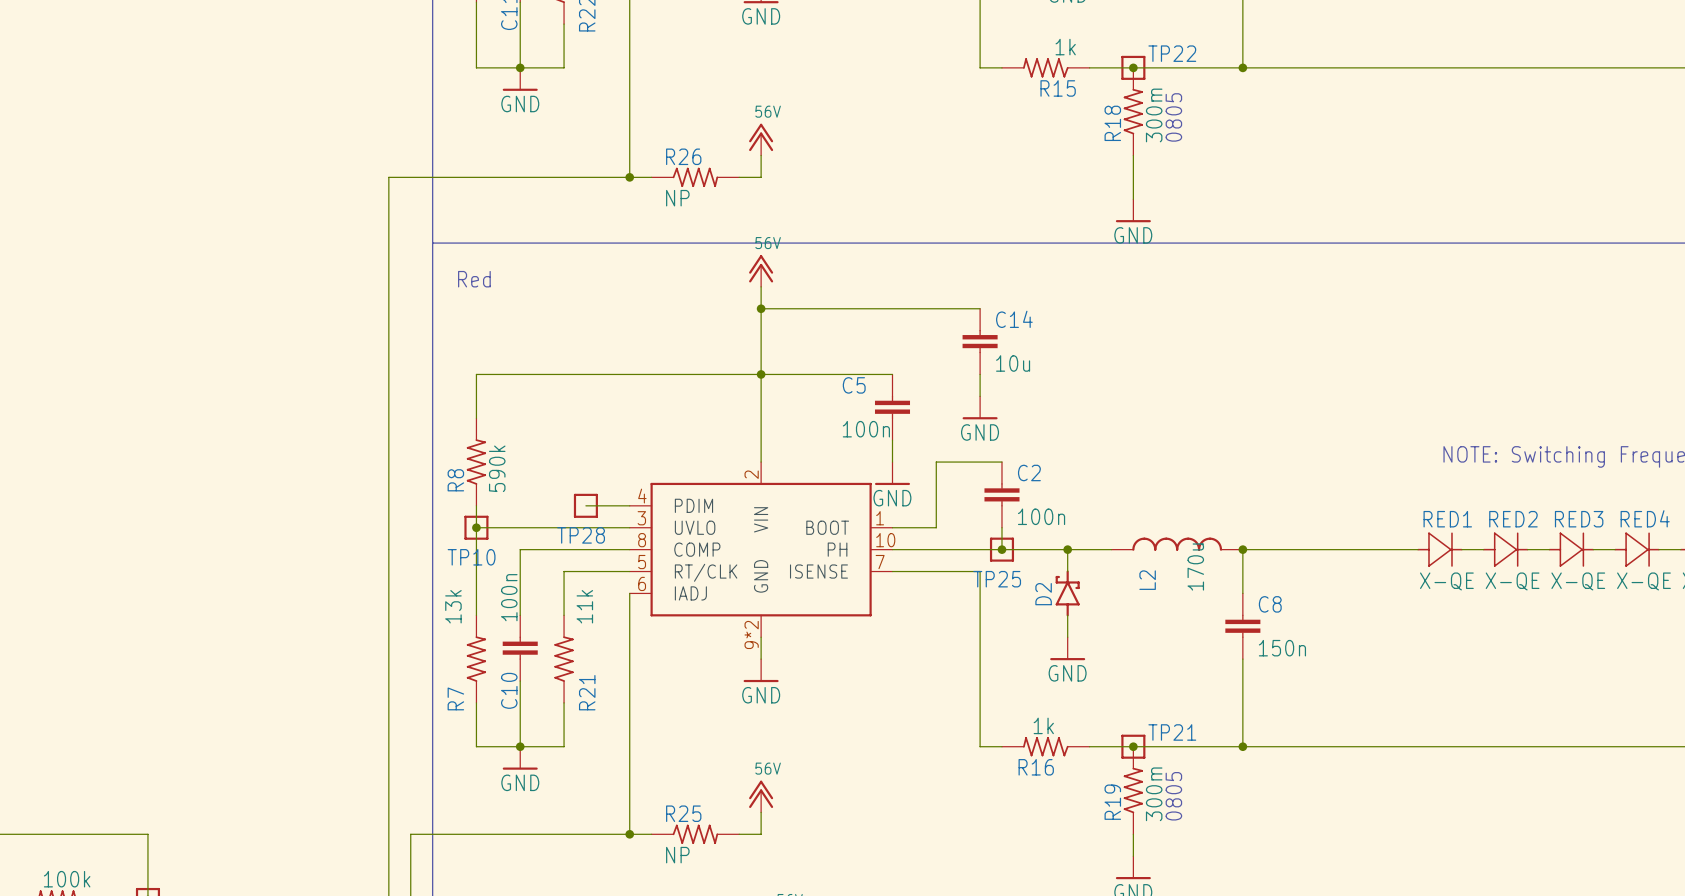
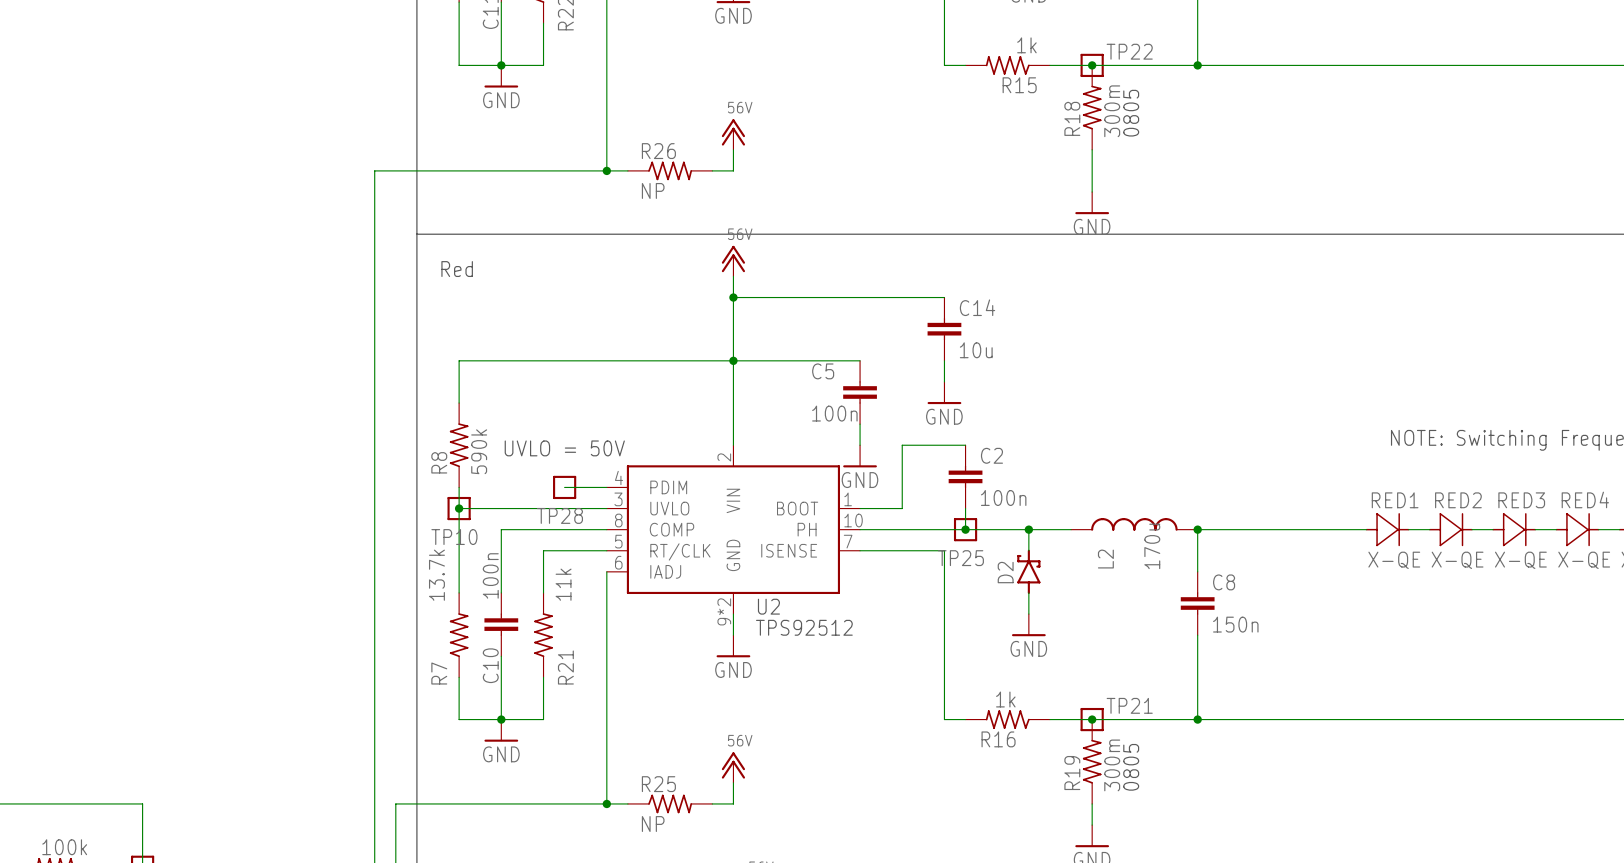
text: none -> UVLO = 50V (564, 448)
R7 value: 13k (453, 606) -> 13.7k (436, 575)
U2 name: none -> U2 (768, 606)
U2 value: none -> TPS92512 (804, 627)

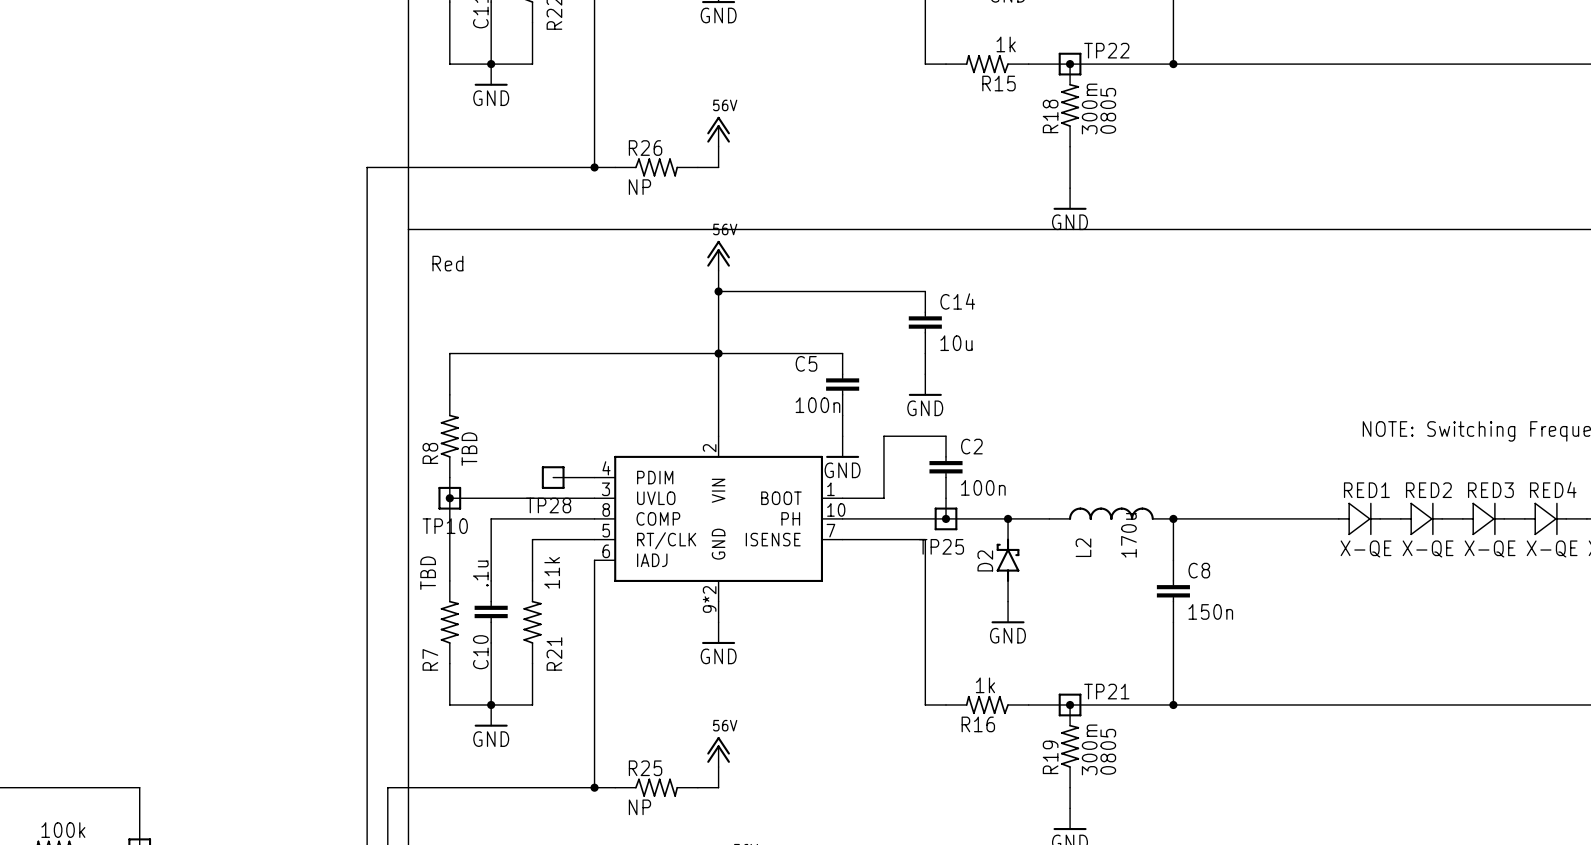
text: UVLO = 50V (564, 448) -> none
R8 value: 590k (479, 451) -> TBD (469, 449)
R7 value: 13.7k (436, 575) -> TBD (428, 573)
C10 value: 100n (490, 575) -> .1u (480, 573)
U2 name: U2 (768, 606) -> none
U2 value: TPS92512 (804, 627) -> none

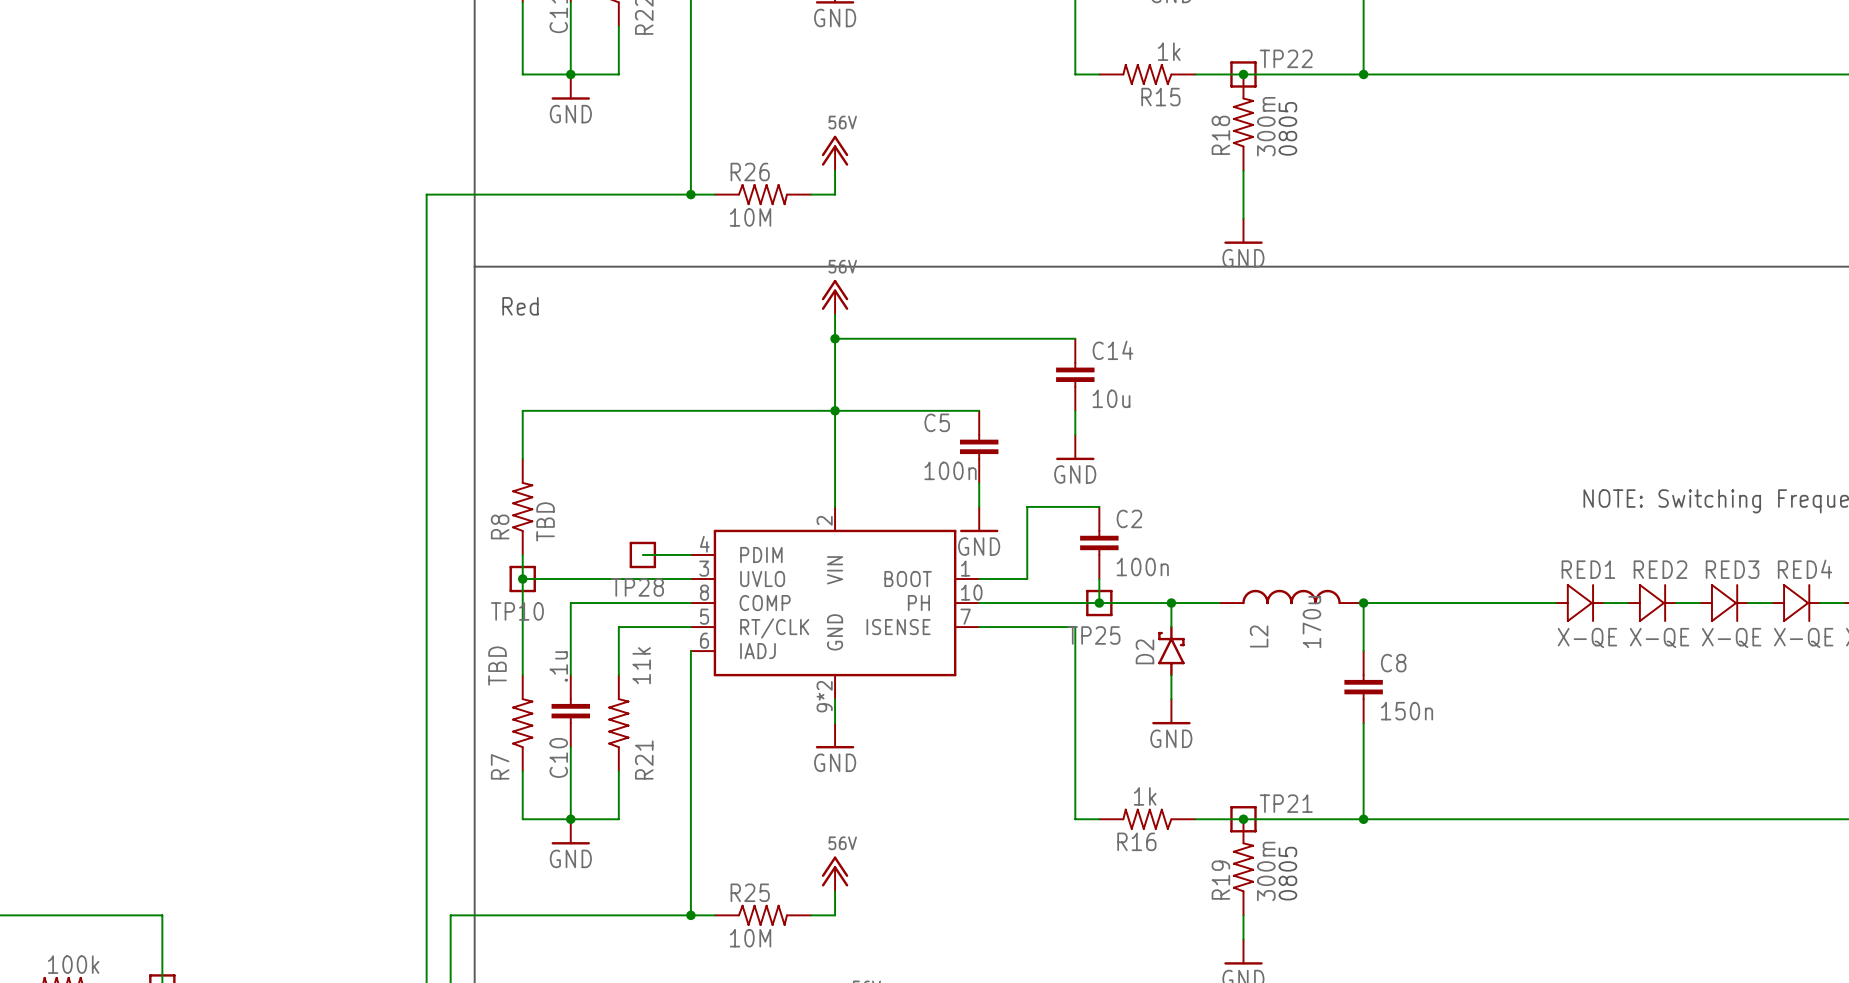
R26 value: NP (639, 187) -> 10M (750, 217)
R25 value: NP (639, 807) -> 10M (750, 938)

